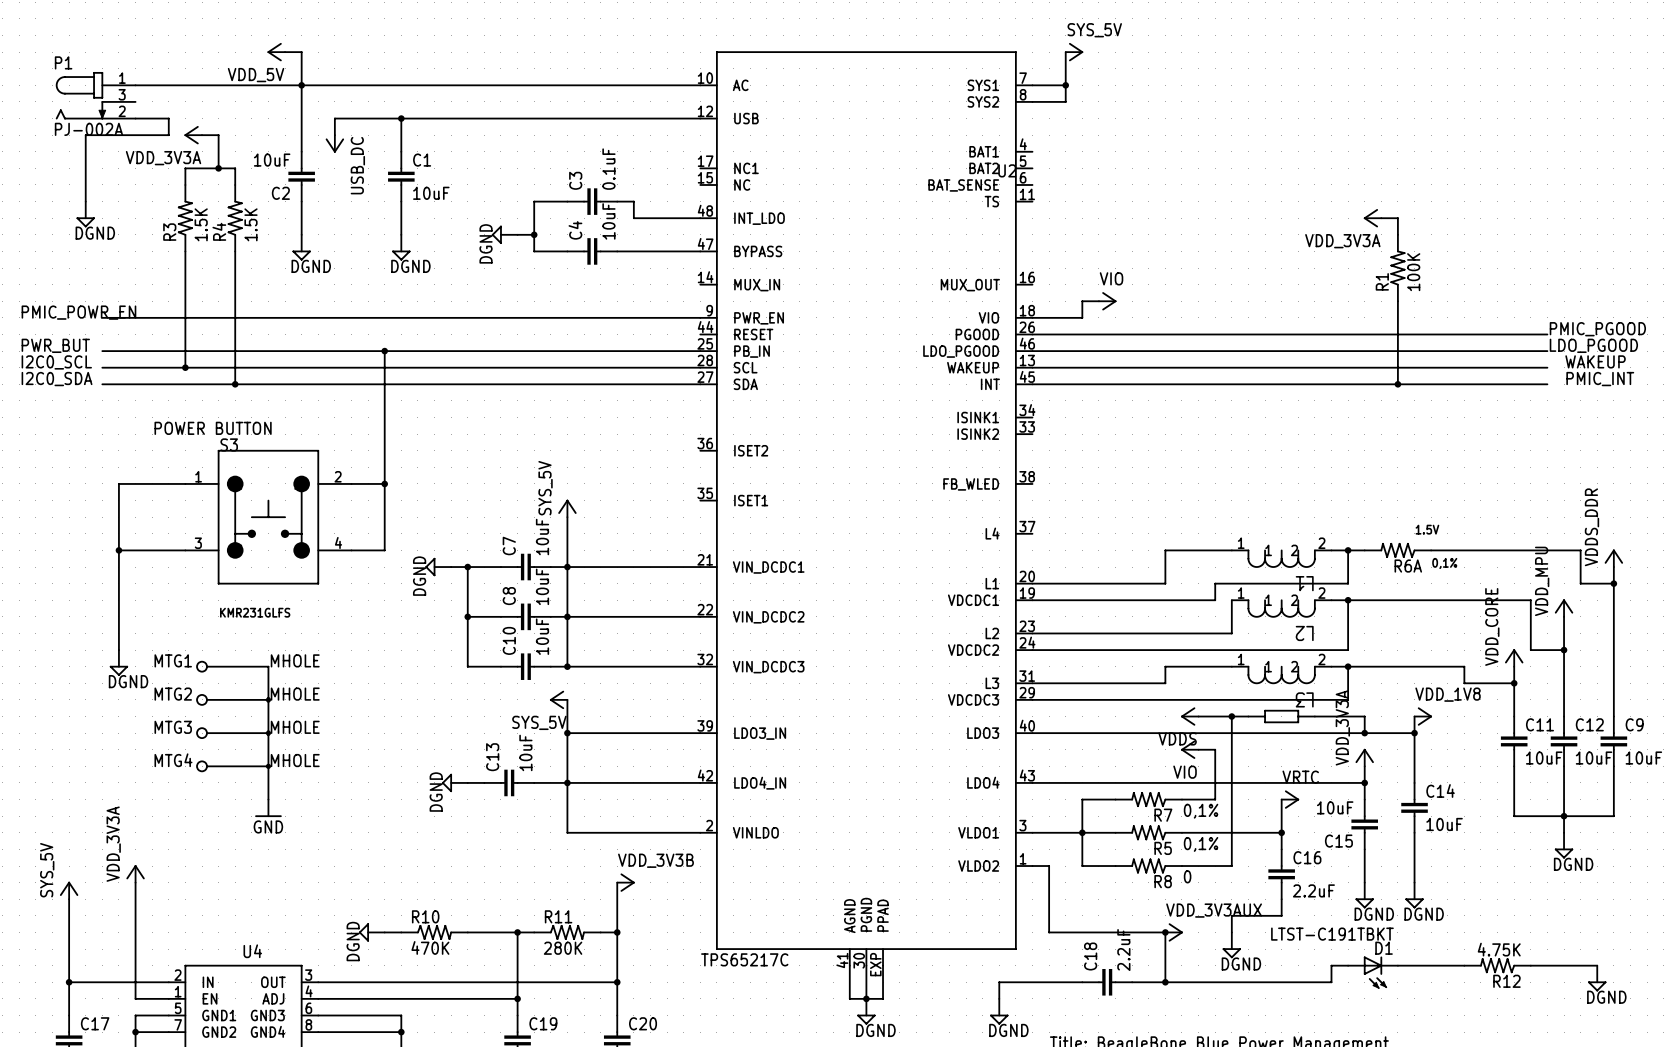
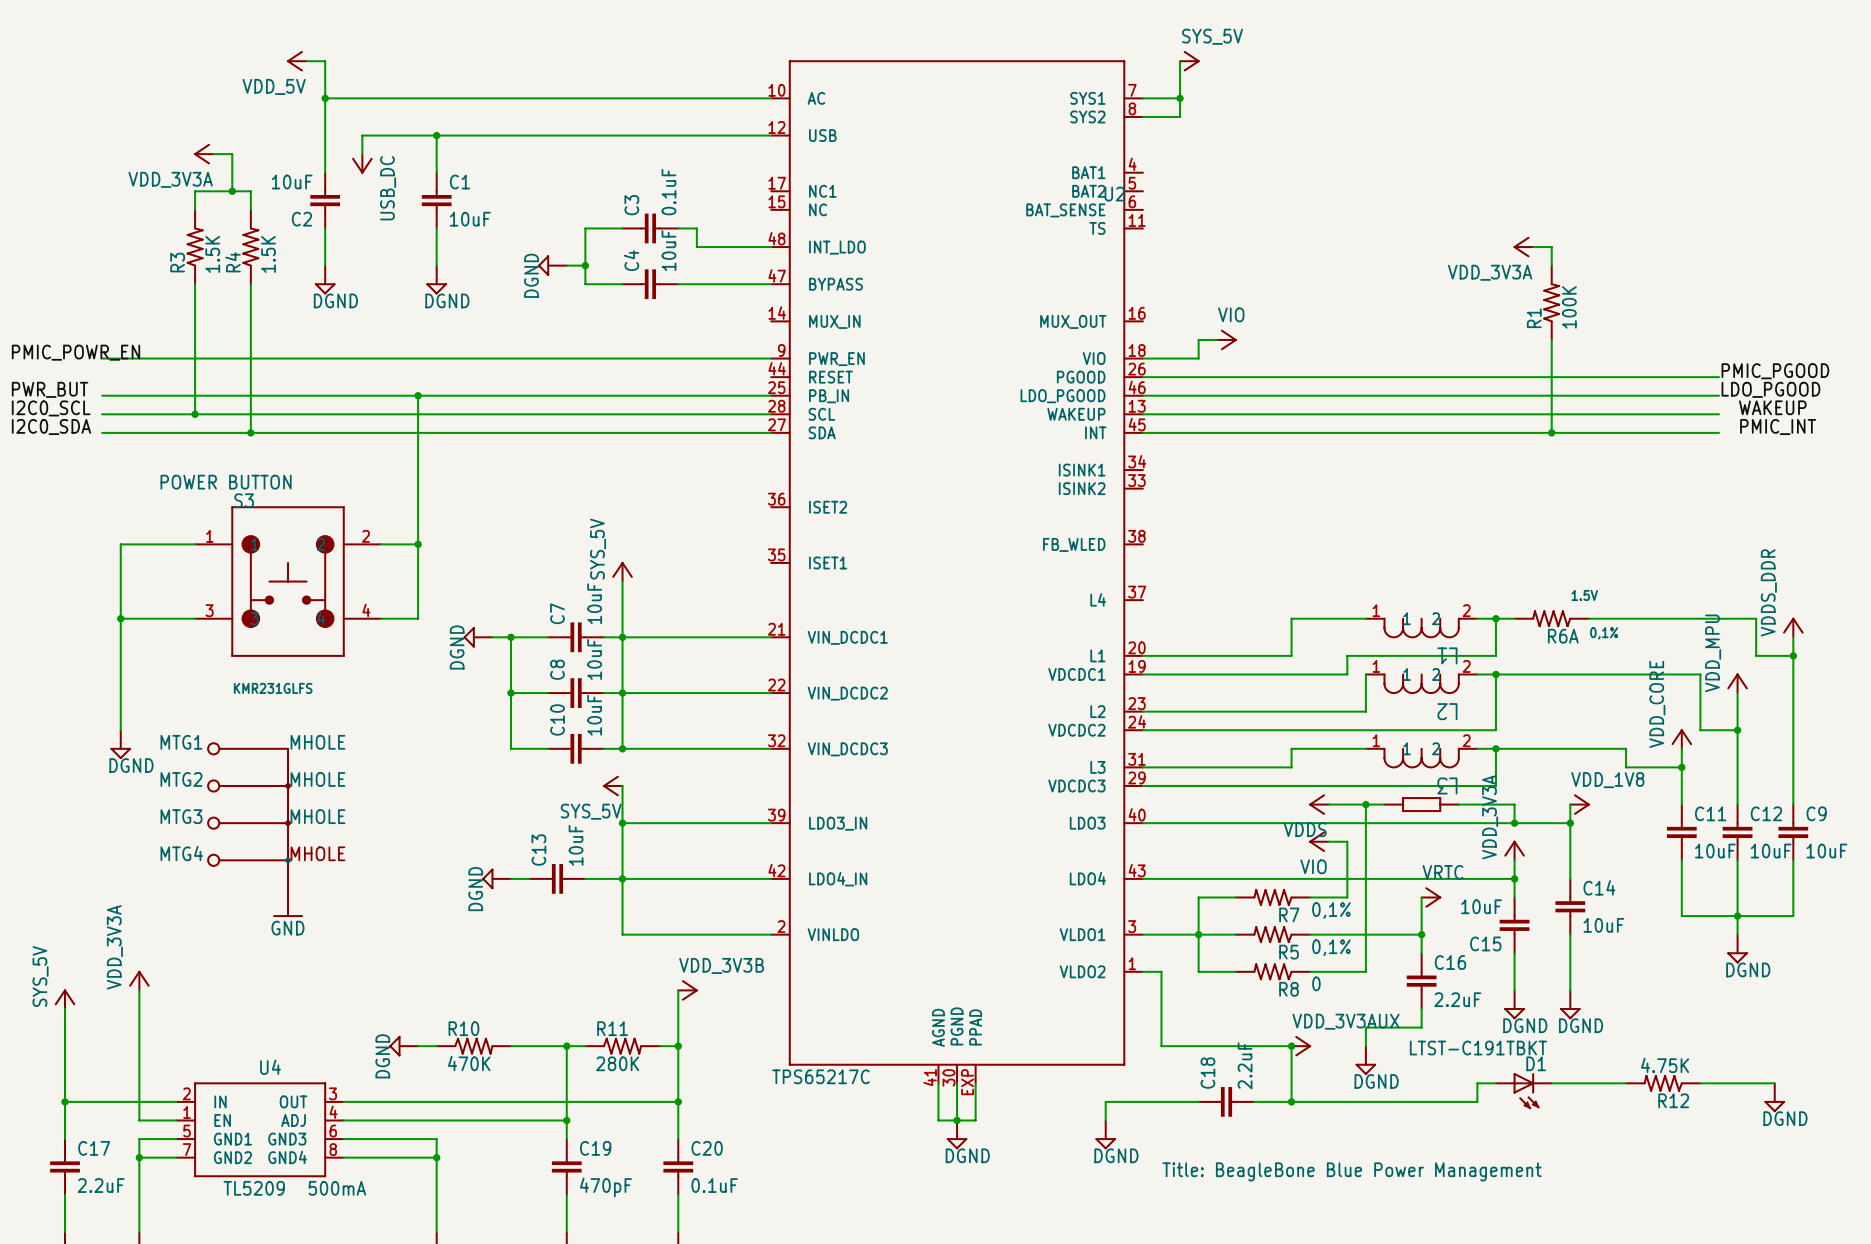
wire: (135, 85) (301, 85) -> none
part: (95, 95) -> none
wire: (135, 118) (168, 118) (168, 135) (85, 135) (85, 201) -> none
power symbol: DGND (85, 214) -> none

